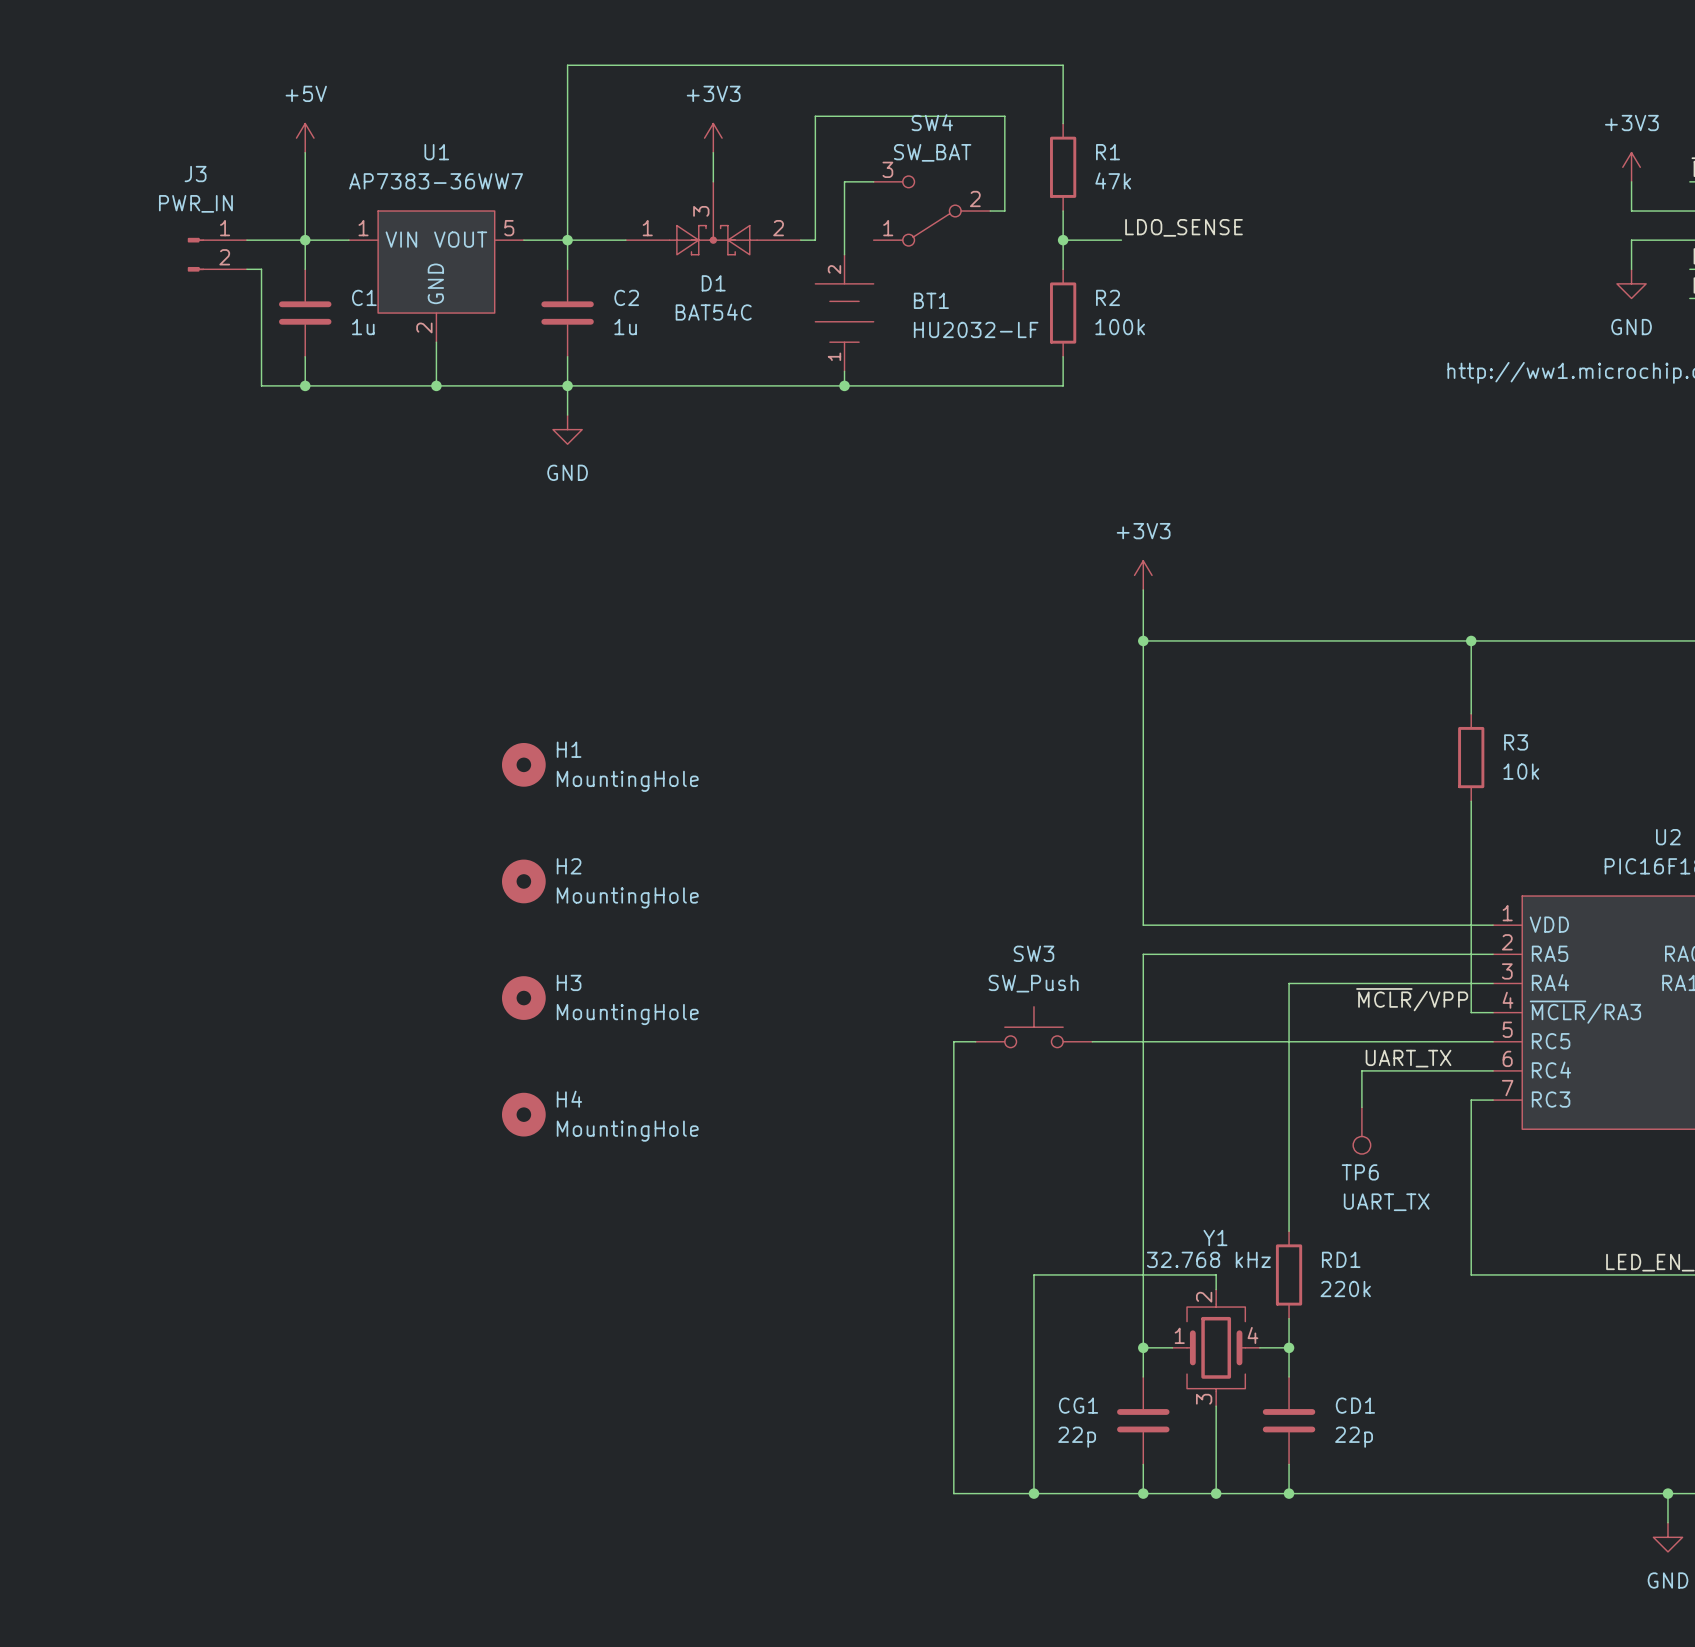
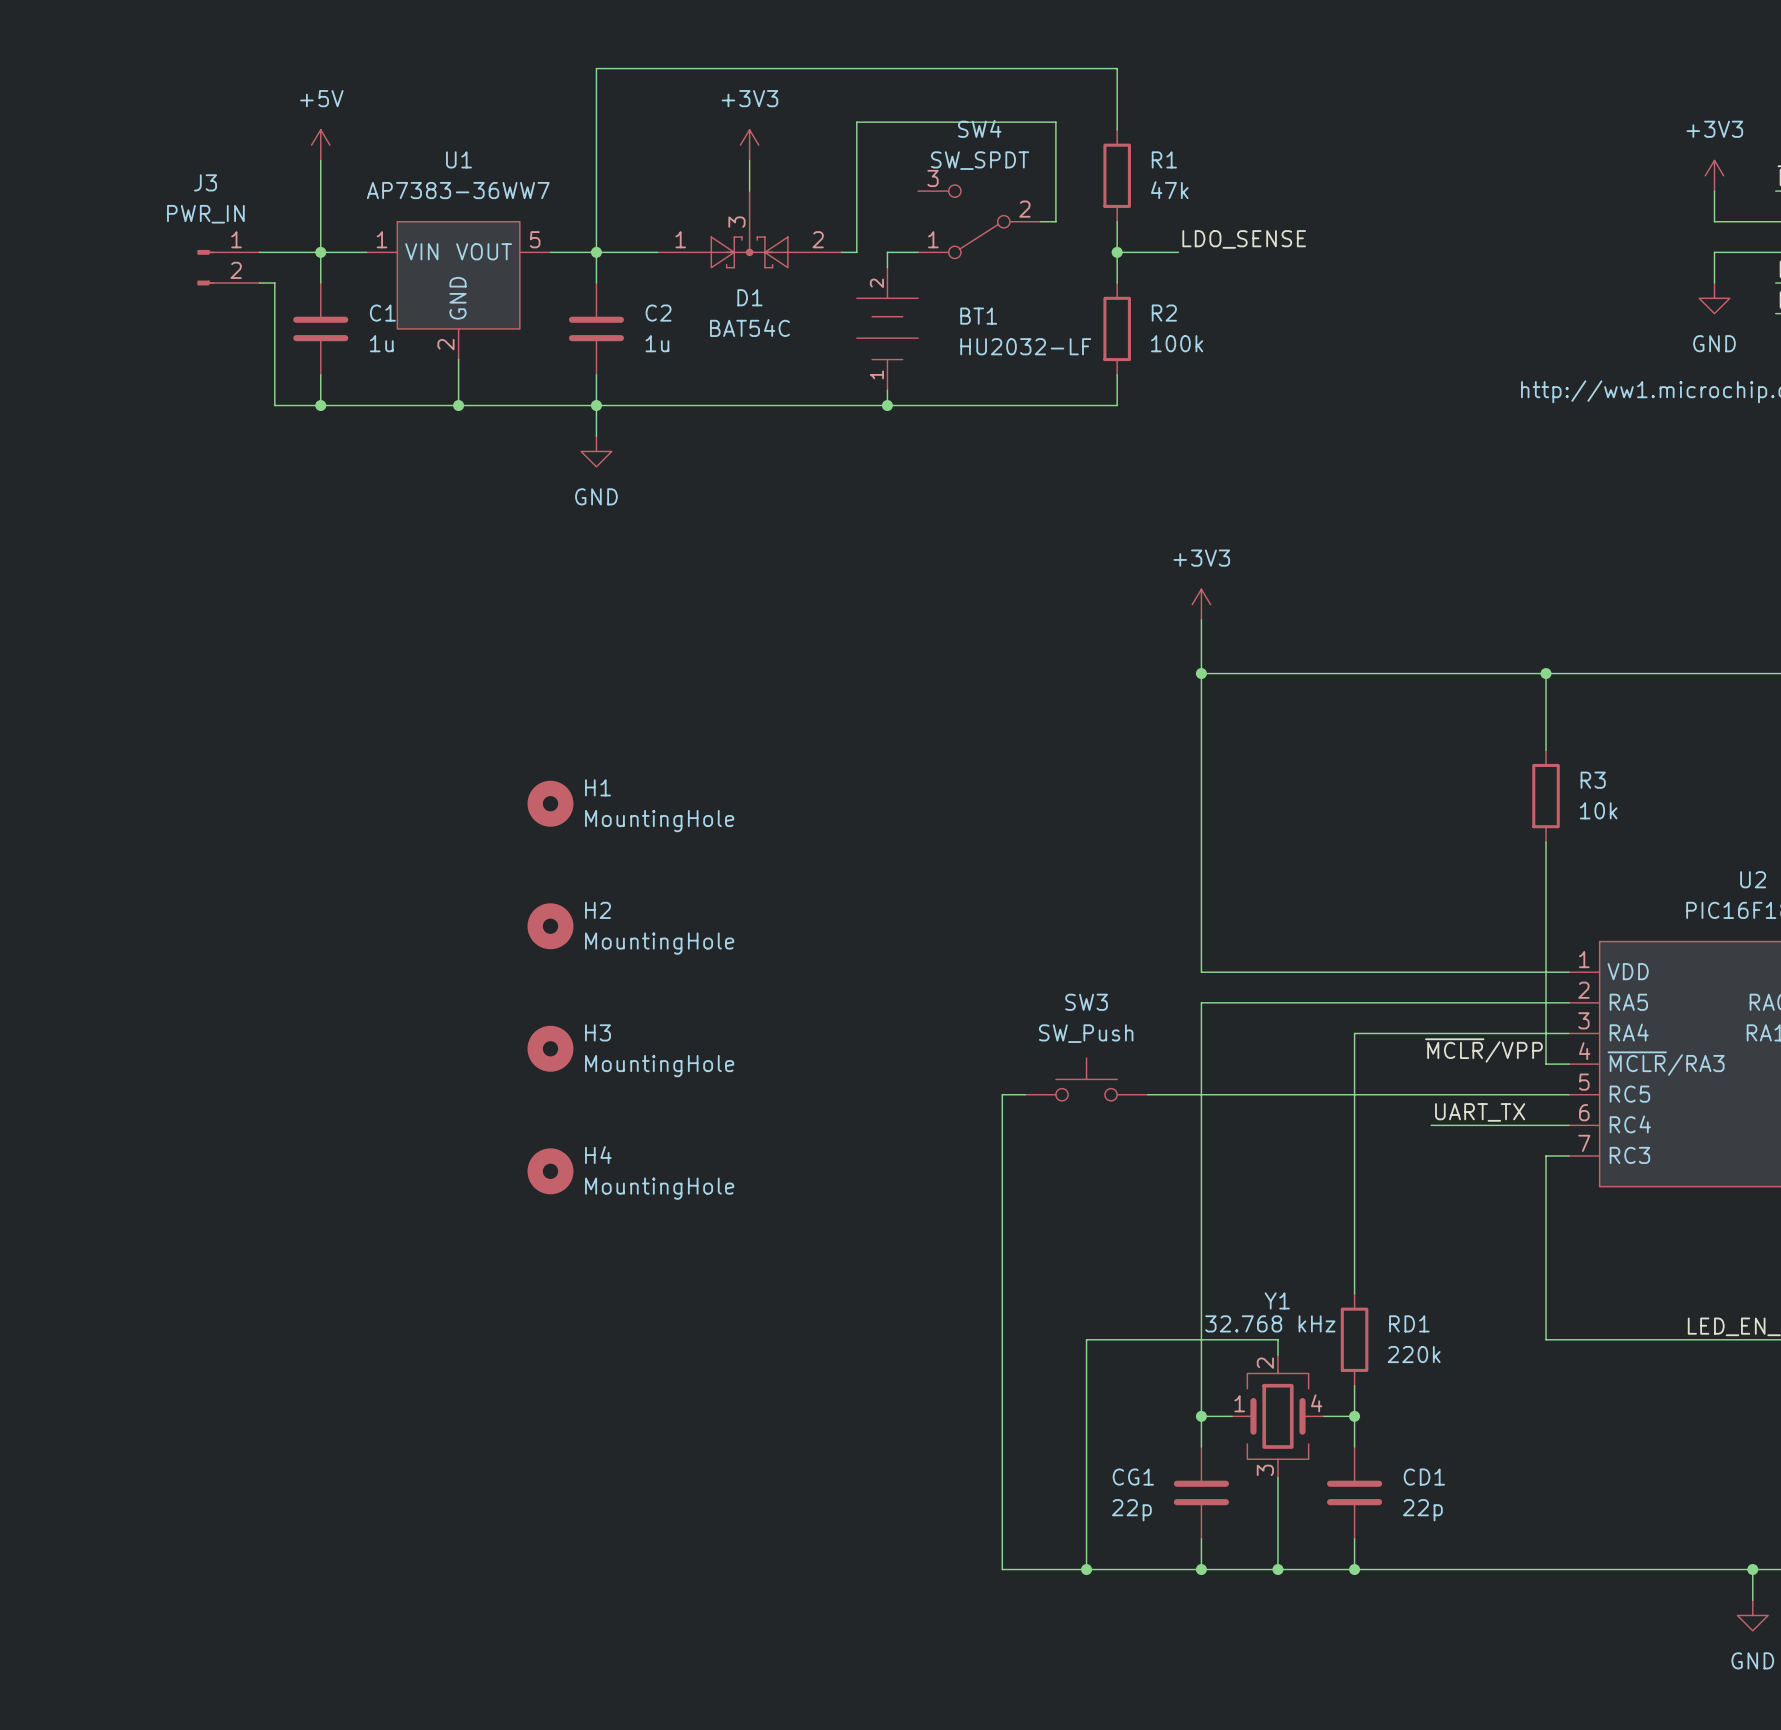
SW4 value: SW_BAT (932, 152) -> SW_SPDT (980, 160)
wire: (873, 181) (844, 181) (844, 240) -> (918, 252) (887, 252)
wire: (1361, 1070) (1361, 1107) -> none
TP6: UART_TX (1361, 1130) -> none

